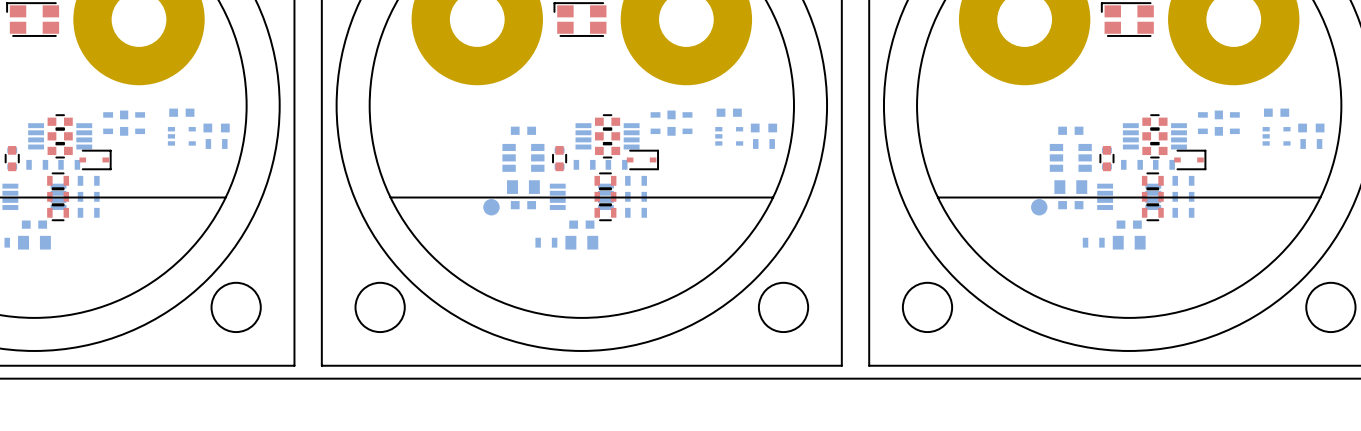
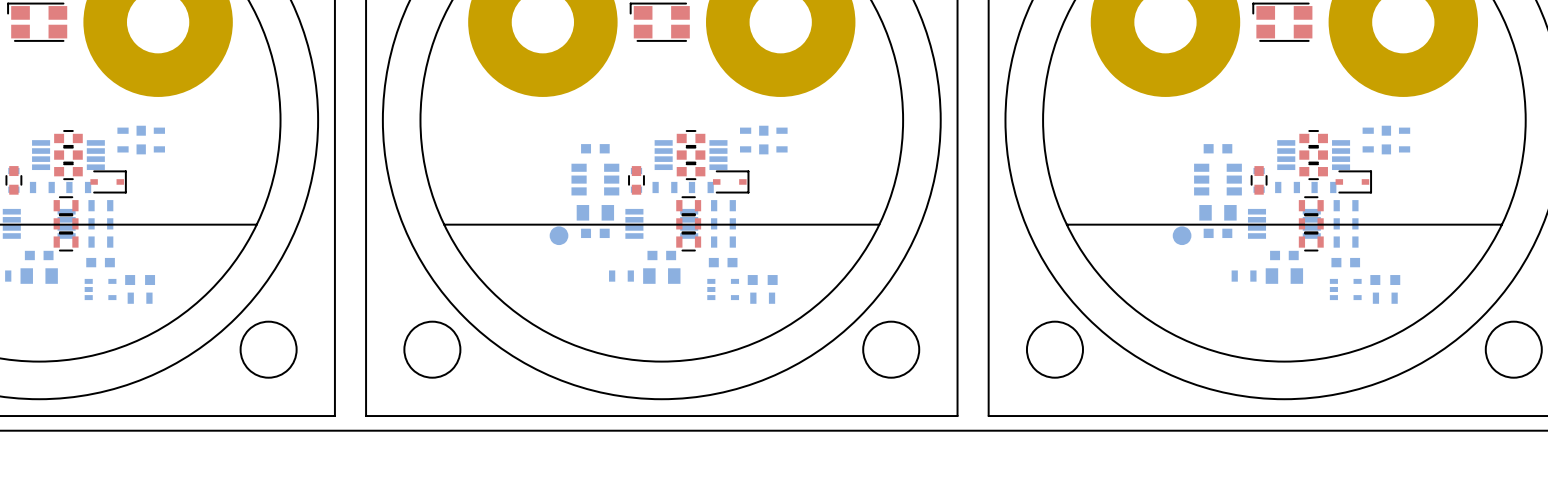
part position: (181, 112) -> (100, 262)
part position: (729, 112) -> (723, 262)
part position: (1276, 112) -> (1345, 262)
part position: (216, 127) -> (140, 280)
part position: (763, 127) -> (762, 280)
part position: (1311, 127) -> (1385, 280)
part position: (181, 136) -> (100, 289)
part position: (729, 136) -> (723, 289)
part position: (1276, 136) -> (1345, 289)
part position: (216, 143) -> (140, 298)
part position: (763, 143) -> (762, 298)
part position: (1311, 143) -> (1385, 298)

